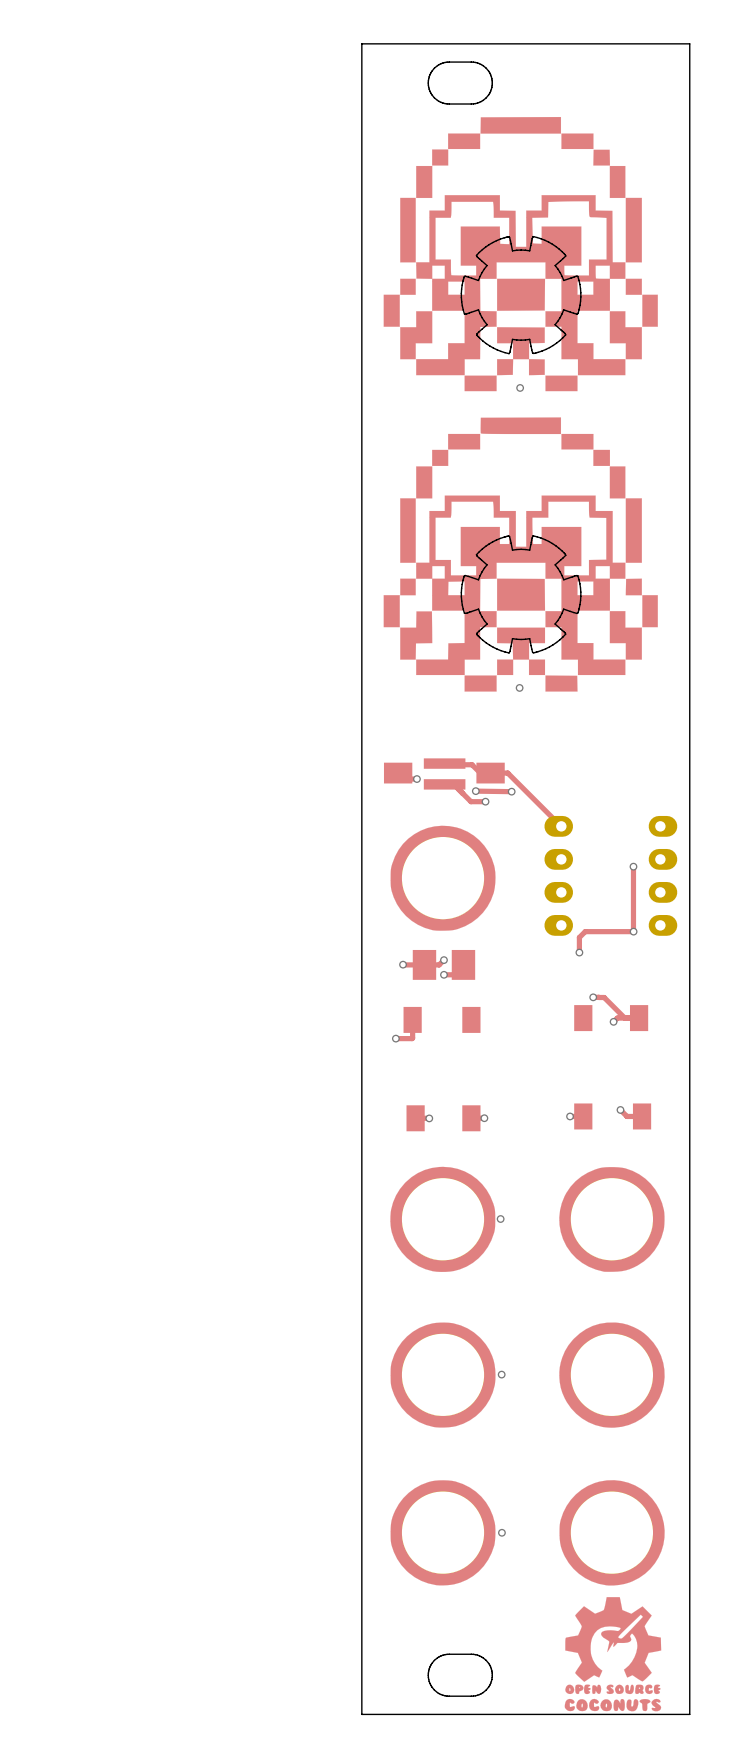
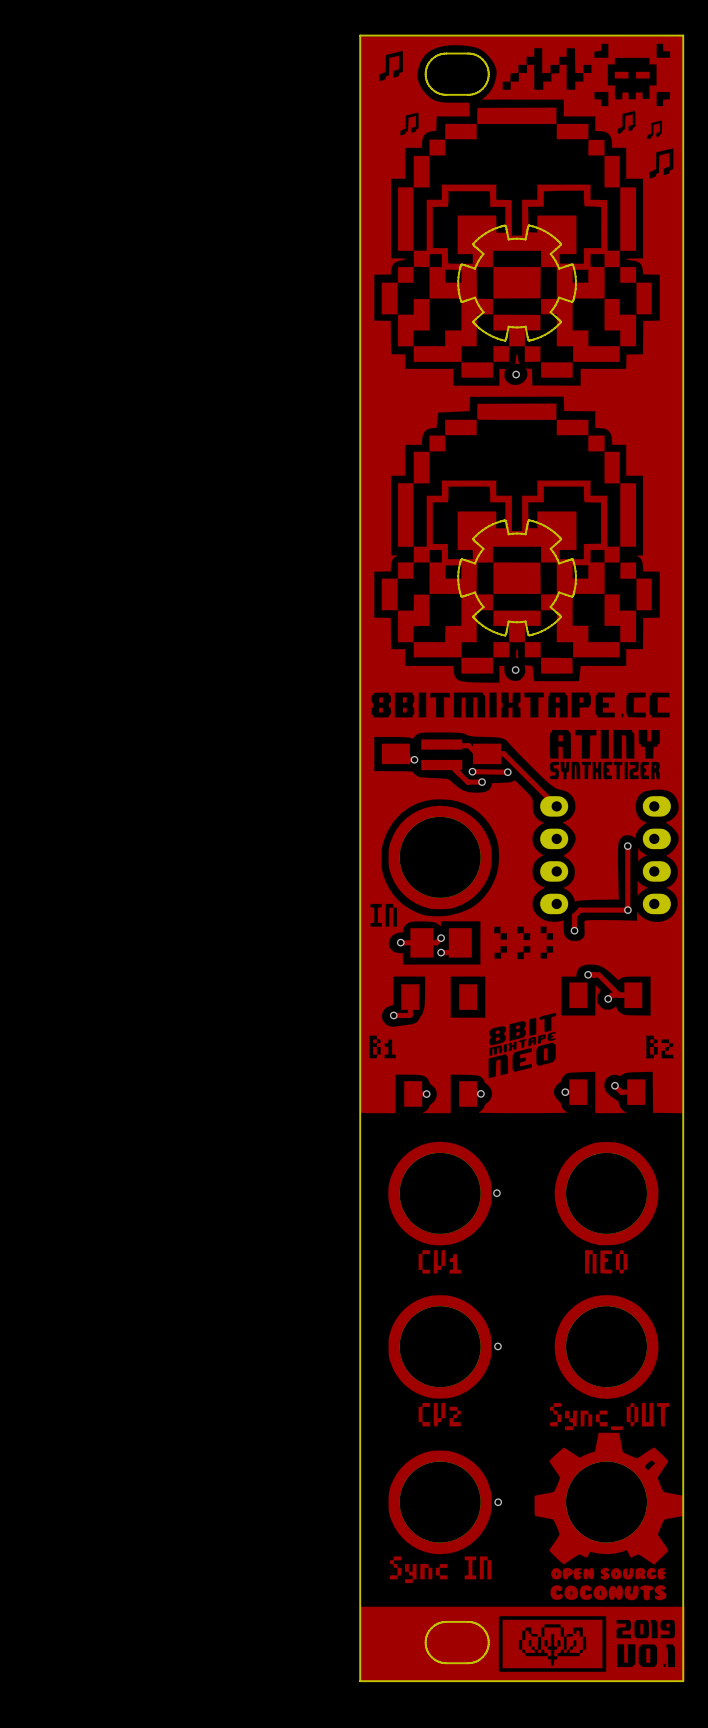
part footprint: [361, 43, 691, 1716] -> [359, 34, 685, 1682]

